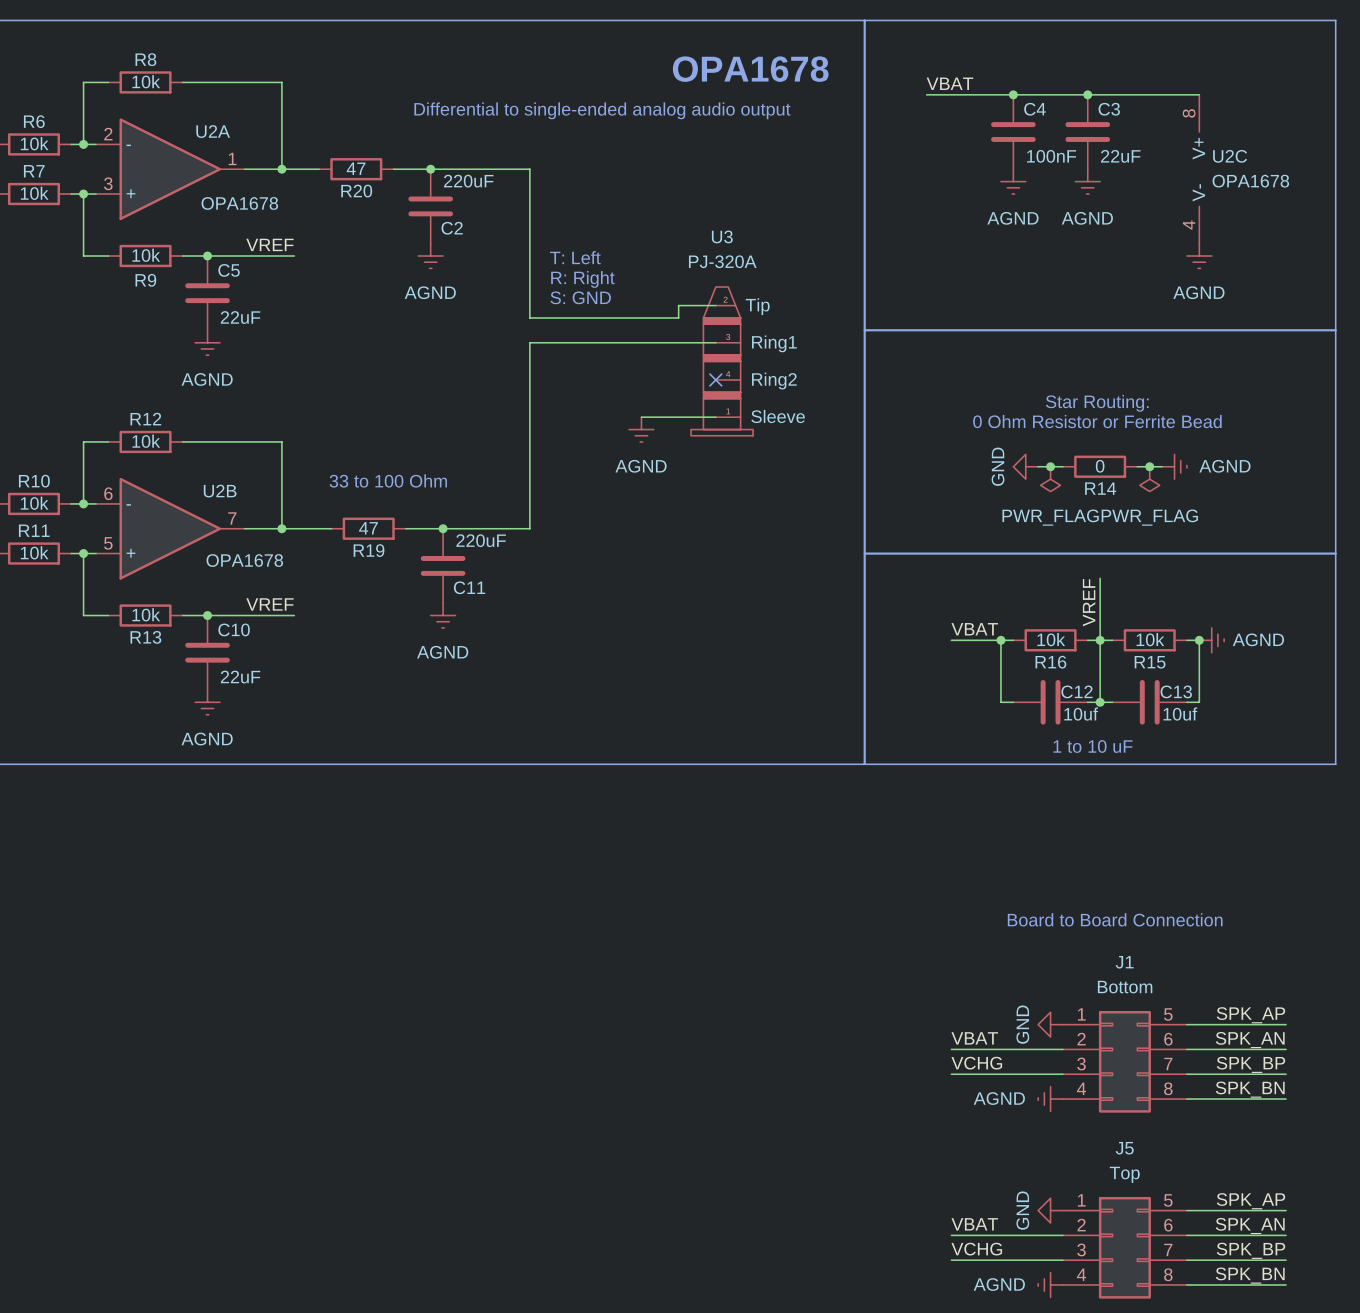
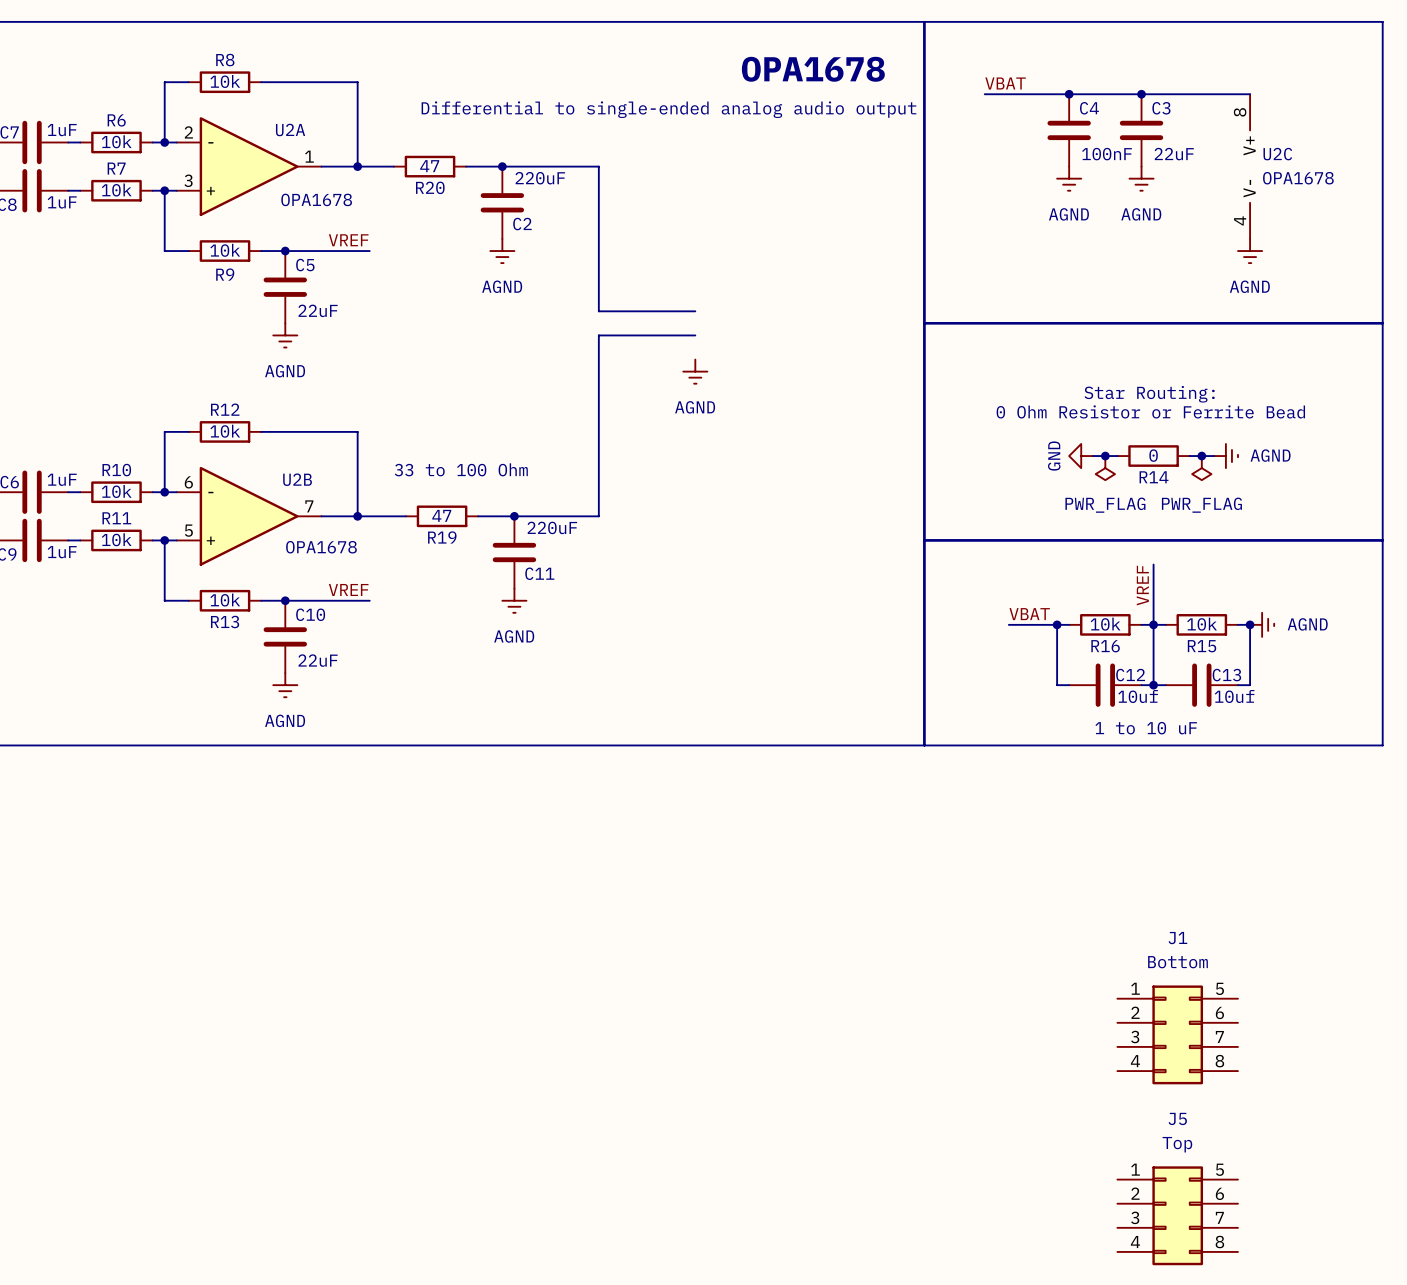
text: T: Left (575, 257) -> none
text: R: Right (582, 279) -> none
text: S: GND (580, 297) -> none
wire: (715, 305) (678, 305) (678, 317) (629, 317) -> none
wire: (629, 342) (715, 342) -> none
U3: PJ-320A (722, 361) -> none
no-connect mark: (715, 379) -> none
wire: (641, 417) (715, 417) -> none
power symbol position: AGND (641, 429) -> AGND (695, 371)
text: Board to Board Connection (1115, 919) -> none
label: SPK_AP (1250, 1015) -> none
power symbol: GND (1050, 1024) -> none
wire: (1186, 1024) (1286, 1024) -> none
label: VBAT (974, 1038) -> none
label: SPK_AN (1250, 1040) -> none
wire: (951, 1049) (1062, 1049) -> none
wire: (1186, 1049) (1286, 1049) -> none
label: VCHG (976, 1063) -> none
label: SPK_BP (1250, 1064) -> none
wire: (951, 1074) (1062, 1074) -> none
wire: (1186, 1074) (1286, 1074) -> none
label: SPK_BN (1250, 1089) -> none
power symbol: AGND (1050, 1099) -> none
wire: (1186, 1099) (1286, 1099) -> none
label: SPK_AP (1250, 1201) -> none
power symbol: GND (1050, 1210) -> none
wire: (1186, 1210) (1286, 1210) -> none
label: VBAT (974, 1224) -> none
label: SPK_AN (1250, 1226) -> none
wire: (951, 1235) (1062, 1235) -> none
wire: (1186, 1235) (1286, 1235) -> none
label: VCHG (976, 1249) -> none
label: SPK_BP (1250, 1250) -> none
wire: (951, 1260) (1062, 1260) -> none
wire: (1186, 1260) (1286, 1260) -> none
label: SPK_BN (1250, 1275) -> none
power symbol: AGND (1050, 1284) -> none
wire: (1186, 1284) (1286, 1284) -> none

